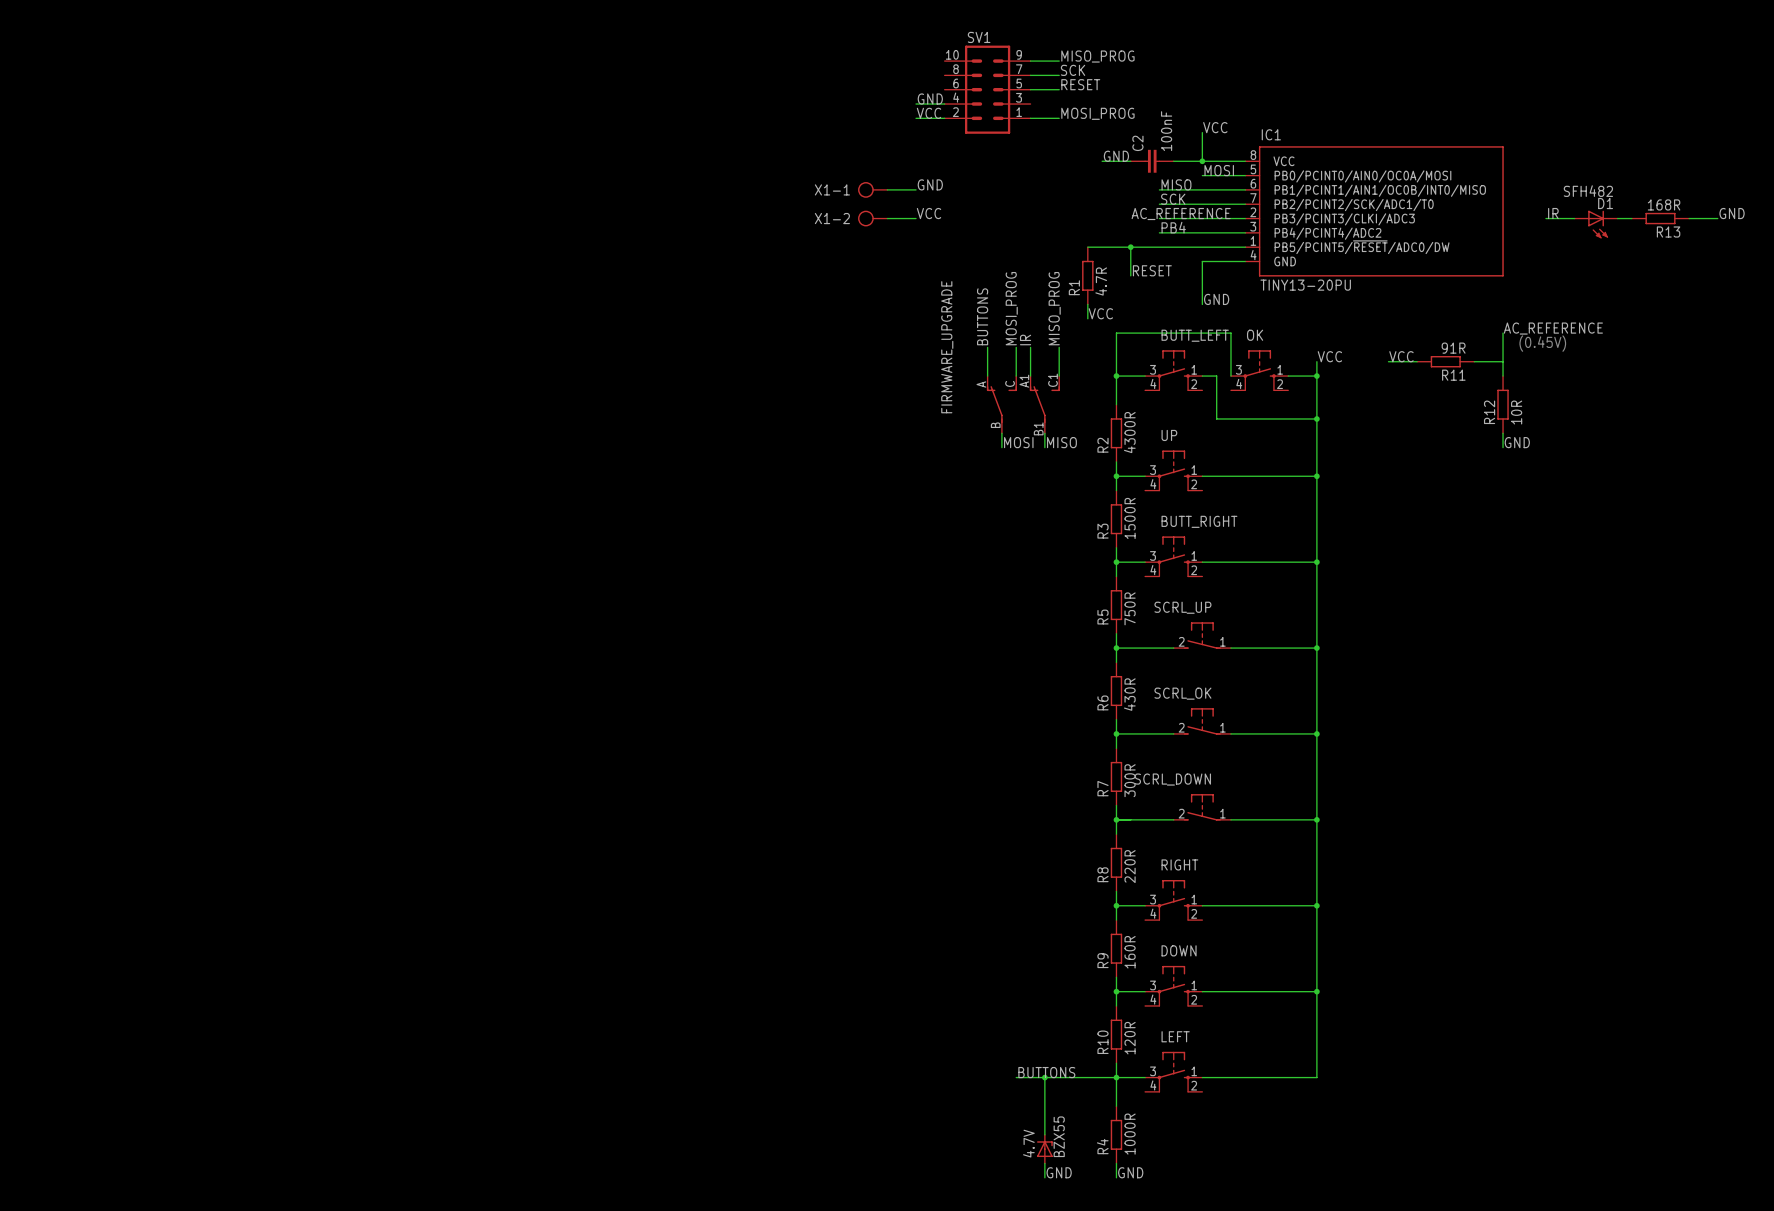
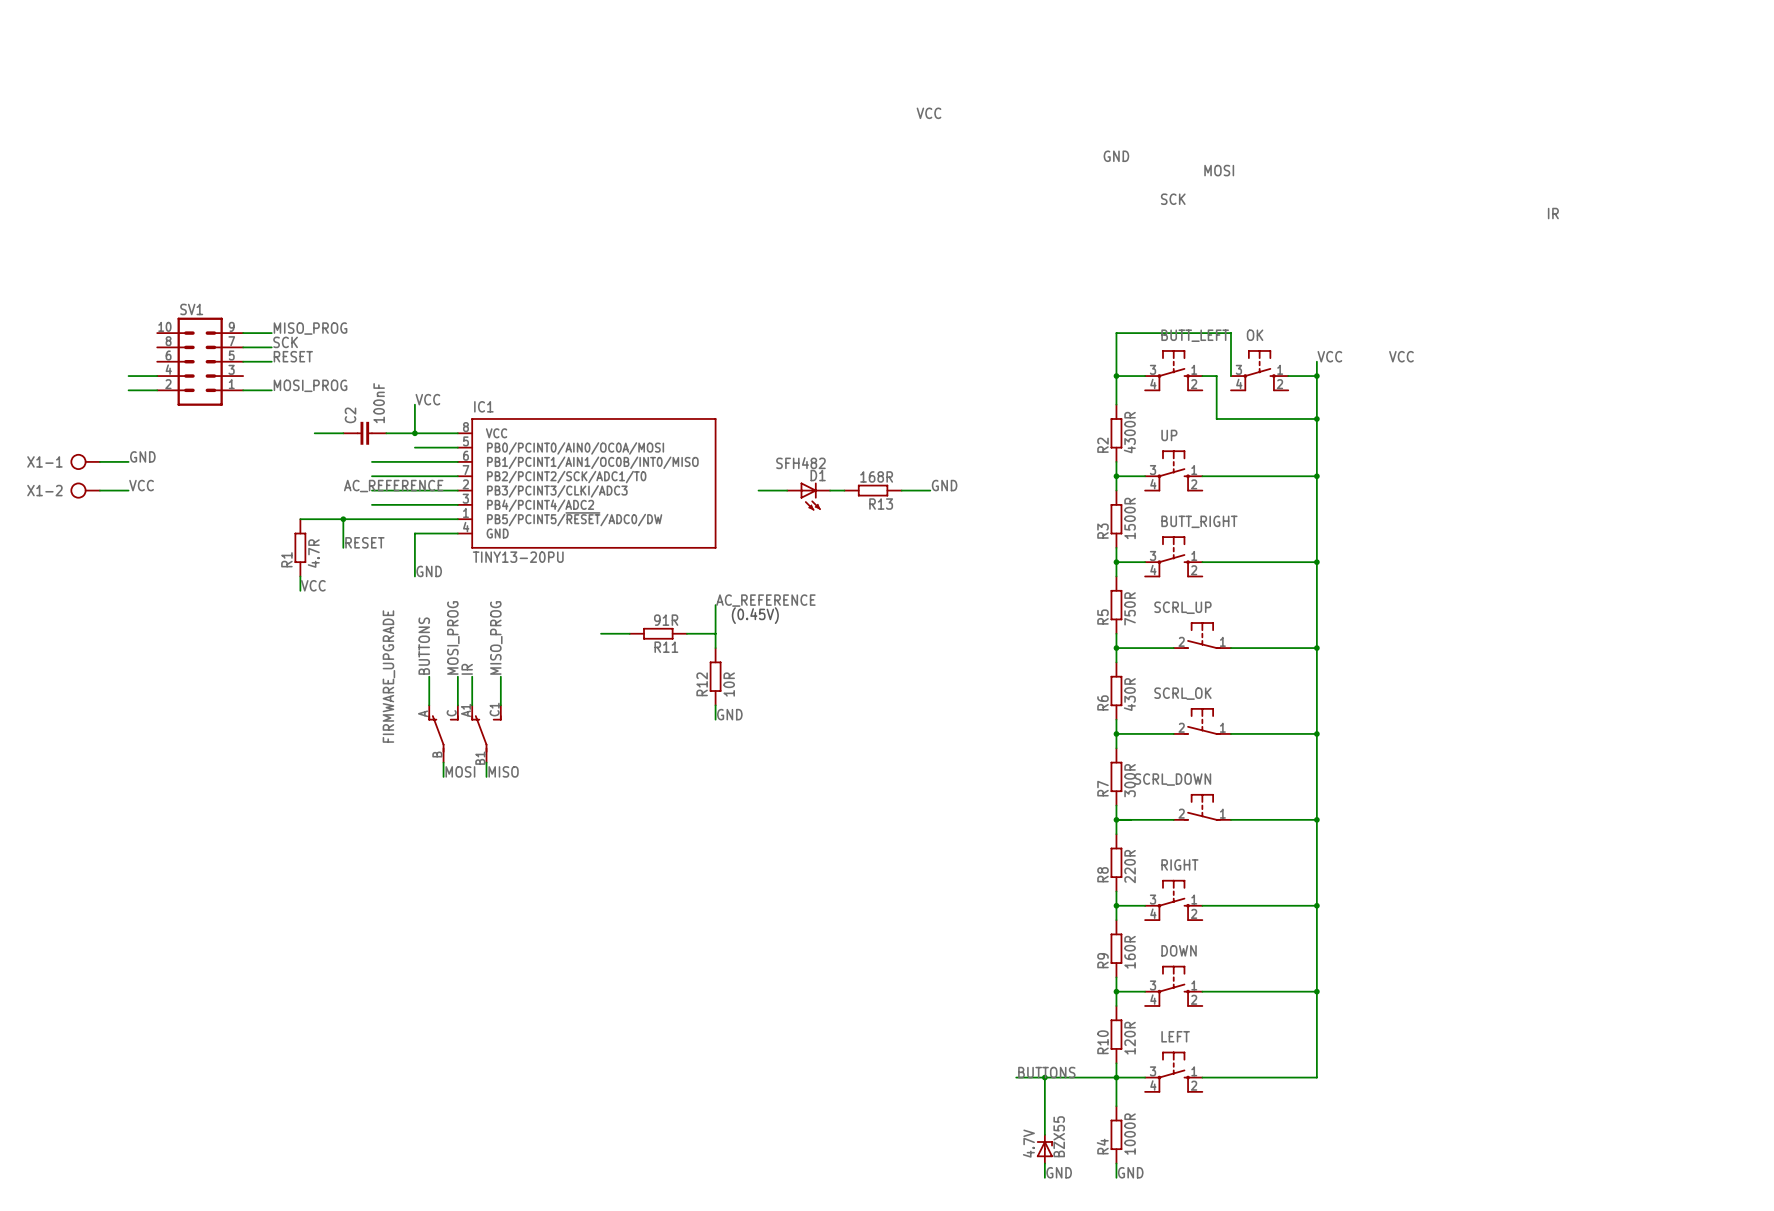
label: MISO_PROG (1097, 56) -> none
wire: (1030, 61) (1059, 61) -> none
label: SCK (1073, 70) -> none
wire: (1030, 75) (1059, 75) -> none
label: RESET (1080, 84) -> none
SV1 position: (987, 89) -> (200, 361)
wire: (1030, 89) (1059, 89) -> none
label: GND (930, 99) -> none
wire: (916, 104) (944, 104) -> none
label: MOSI_PROG (1097, 113) -> none
wire: (916, 118) (944, 118) -> none
wire: (1030, 118) (1059, 118) -> none
label: VCC (1215, 127) -> none
wire: (1202, 132) (1202, 161) -> none
wire: (1102, 161) (1130, 161) -> none
C2 position: (1152, 161) -> (364, 433)
wire: (1173, 161) (1245, 161) -> none
junction: (1202, 161) -> none
wire: (1202, 175) (1245, 175) -> none
label: GND (930, 184) -> none
label: MISO (1176, 184) -> none
X1-1 position: (872, 189) -> (85, 461)
wire: (887, 189) (916, 189) -> none
wire: (1159, 189) (1245, 189) -> none
wire: (1159, 204) (1245, 204) -> none
IC1 position: (1374, 211) -> (587, 483)
label: VCC (929, 213) -> none
label: GND (1732, 213) -> none
label: AC_REFERENCE (1181, 214) -> none
X1-2 position: (872, 218) -> (85, 490)
wire: (887, 218) (916, 218) -> none
wire: (1159, 218) (1245, 218) -> none
wire: (1545, 218) (1574, 218) -> none
wire: (1617, 218) (1631, 218) -> none
R13 position: (1660, 218) -> (873, 490)
wire: (1689, 218) (1717, 218) -> none
D1 position: (1596, 224) -> (808, 496)
label: PB4 (1173, 227) -> none
wire: (1159, 232) (1245, 232) -> none
wire: (1087, 247) (1245, 247) -> none
wire: (1130, 247) (1130, 275) -> none
junction: (1130, 247) -> none
wire: (1245, 261) (1202, 261) (1202, 304) -> none
label: RESET (1152, 270) -> none
R1 position: (1087, 275) -> (300, 547)
label: GND (1216, 299) -> none
wire: (1087, 304) (1087, 318) -> none
label: MOSI_PROG (1011, 308) -> none
label: MISO_PROG (1054, 308) -> none
label: VCC (1100, 313) -> none
label: BUTTONS (982, 316) -> none
label: none -> MISO_PROG (310, 328)
label: AC_REFERENCE (1553, 328) -> none
wire: none -> (243, 333) (271, 333)
wire: (1503, 333) (1503, 376) -> none
label: IR (1025, 340) -> none
label: none -> SCK (285, 342)
text: (0.45V) (1542, 343) -> none
wire: none -> (243, 347) (271, 347)
wire: (987, 347) (987, 376) -> none
wire: (1016, 347) (1016, 376) -> none
wire: (1030, 347) (1030, 376) -> none
wire: (1059, 347) (1059, 376) -> none
label: none -> RESET (293, 356)
wire: none -> (243, 361) (271, 361)
wire: (1388, 361) (1417, 361) -> none
R11 position: (1445, 361) -> (658, 633)
wire: (1474, 361) (1503, 361) -> none
wire: none -> (128, 376) (157, 376)
label: none -> MOSI_PROG (310, 385)
wire: none -> (128, 390) (157, 390)
wire: none -> (243, 390) (271, 390)
label: none -> VCC (427, 399)
wire: none -> (414, 404) (414, 433)
FIRMWARE_UPGRADE: (1023, 404) -> none
R12 position: (1503, 404) -> (715, 676)
wire: none -> (314, 433) (343, 433)
wire: none -> (386, 433) (457, 433)
junction: none -> (414, 433)
wire: (1001, 433) (1001, 447) -> none
wire: (1044, 433) (1044, 447) -> none
wire: (1503, 433) (1503, 447) -> none
label: MOSI (1018, 442) -> none
label: MISO (1061, 442) -> none
label: GND (1517, 442) -> none
wire: none -> (414, 447) (457, 447)
label: none -> GND (142, 456)
wire: none -> (99, 461) (128, 461)
wire: none -> (371, 461) (457, 461)
wire: none -> (371, 476) (457, 476)
label: none -> VCC (141, 485)
label: none -> GND (944, 485)
label: none -> AC_REFERENCE (393, 486)
wire: none -> (99, 490) (128, 490)
wire: none -> (371, 490) (457, 490)
wire: none -> (758, 490) (787, 490)
wire: none -> (830, 490) (844, 490)
wire: none -> (901, 490) (930, 490)
wire: none -> (371, 504) (457, 504)
wire: none -> (300, 519) (457, 519)
wire: none -> (343, 519) (343, 547)
junction: none -> (343, 519)
wire: none -> (457, 533) (414, 533) (414, 576)
label: none -> RESET (364, 542)
label: none -> GND (429, 571)
wire: none -> (300, 576) (300, 590)
label: none -> VCC (313, 585)
label: none -> AC_REFERENCE (765, 600)
wire: none -> (715, 605) (715, 648)
text: none -> (0.45V) (755, 615)
wire: none -> (601, 633) (629, 633)
wire: none -> (686, 633) (715, 633)
label: none -> MOSI_PROG (453, 637)
label: none -> MISO_PROG (496, 637)
label: none -> BUTTONS (424, 646)
label: none -> IR (467, 669)
wire: none -> (429, 676) (429, 705)
wire: none -> (457, 676) (457, 705)
wire: none -> (472, 676) (472, 705)
wire: none -> (500, 676) (500, 705)
wire: none -> (715, 705) (715, 719)
label: none -> GND (729, 714)
FIRMWARE_UPGRADE: none -> (465, 733)
wire: none -> (443, 762) (443, 776)
wire: none -> (486, 762) (486, 776)
label: none -> MOSI (460, 771)
label: none -> MISO (503, 771)

